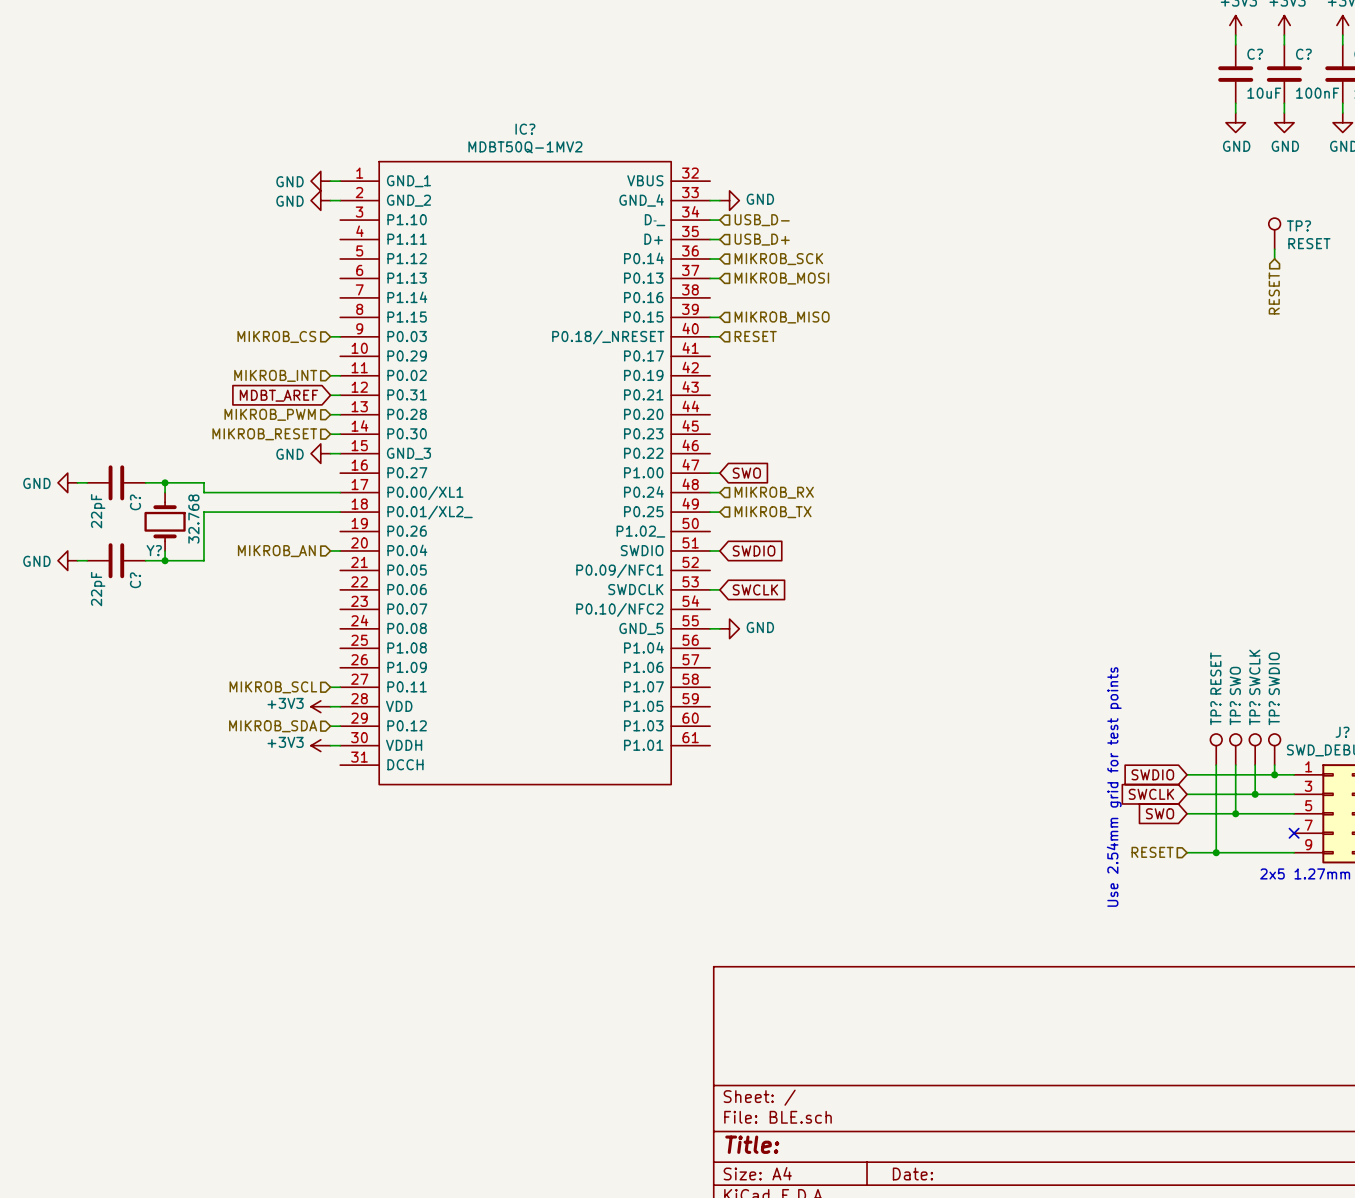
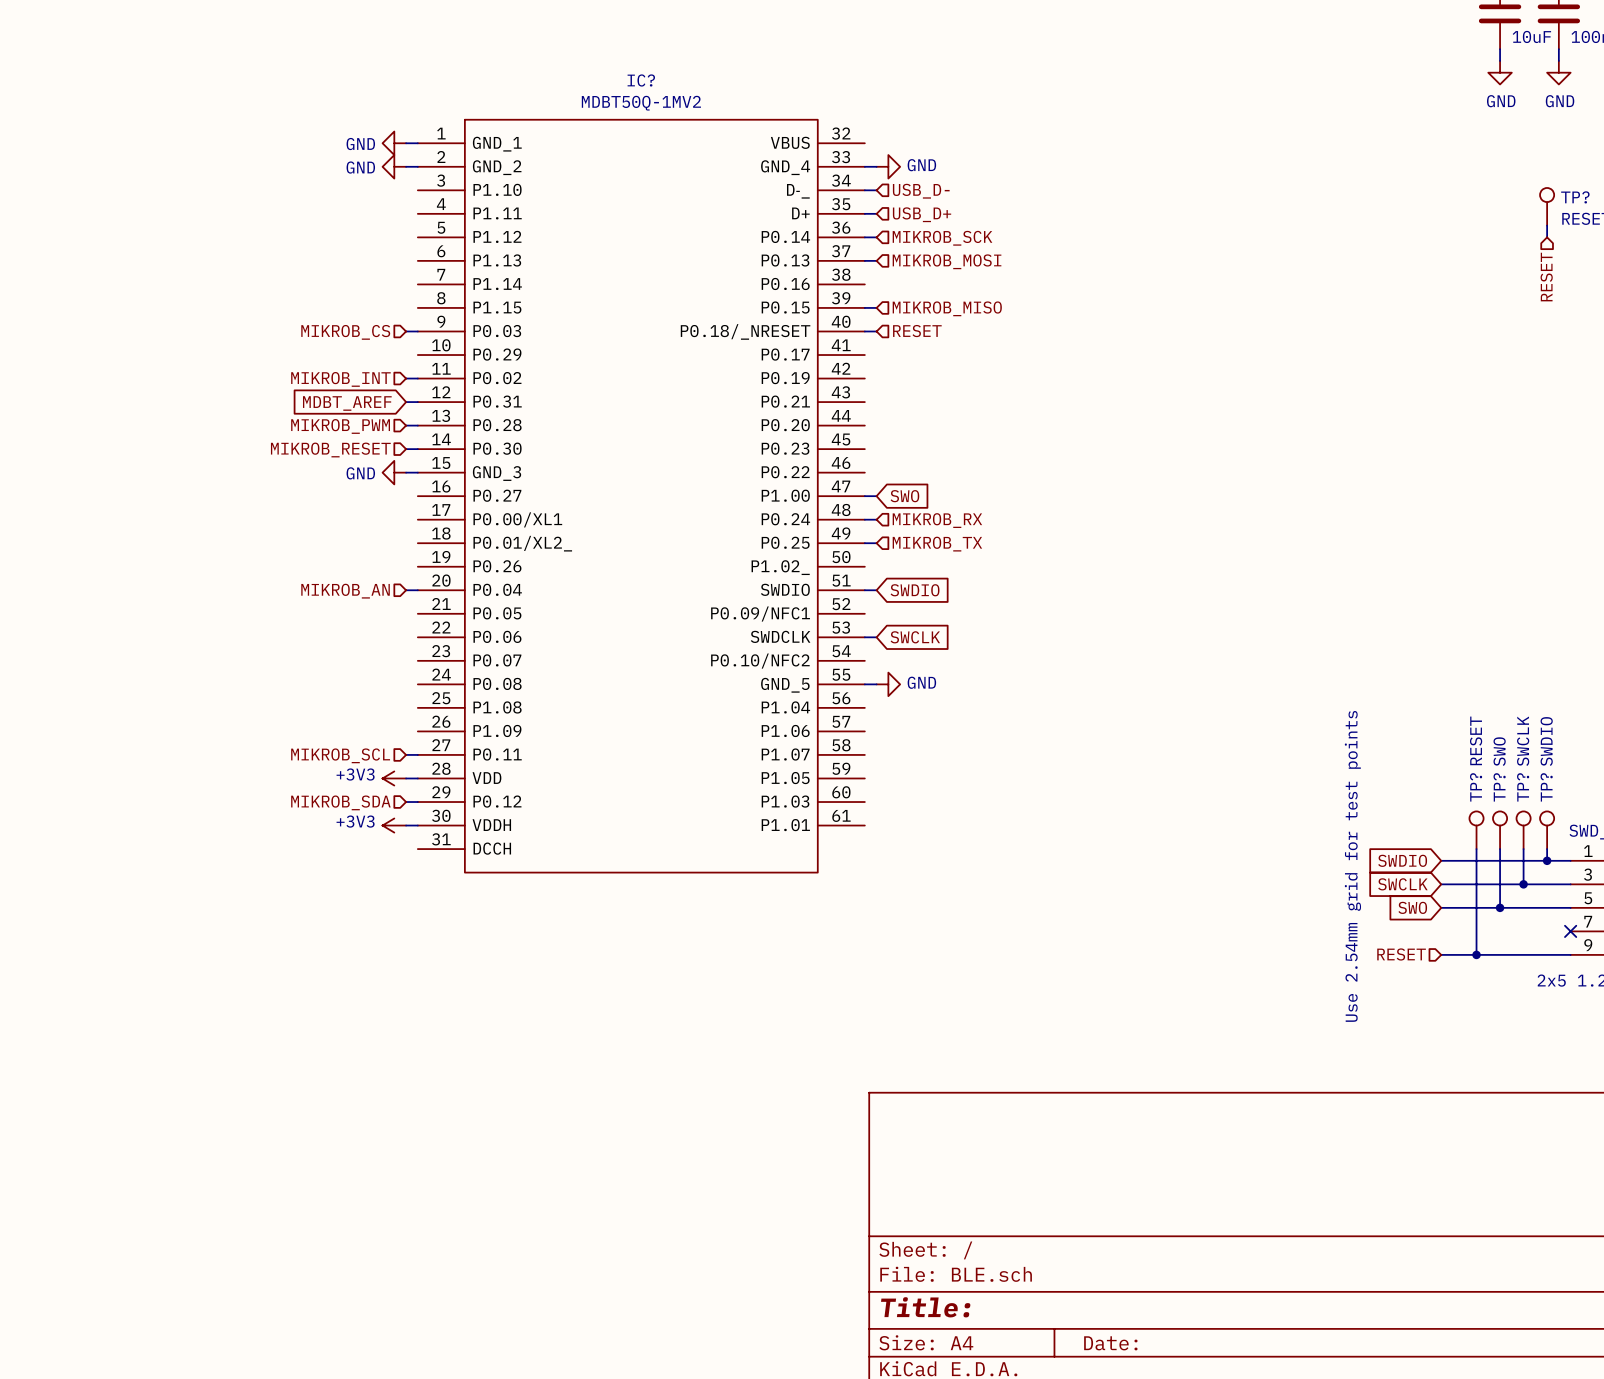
power symbol: GND (67, 482) -> none
wire: (77, 482) (87, 482) -> none
C?: 22pF (116, 482) -> none
wire: (145, 482) (203, 482) (203, 492) (340, 492) -> none
wire: (165, 482) (165, 492) -> none
junction: (165, 482) -> none
wire: (340, 512) (203, 512) (203, 560) (145, 560) -> none
Y?: 32.768 (165, 521) -> none
wire: (165, 550) (165, 560) -> none
power symbol: GND (67, 560) -> none
wire: (77, 560) (87, 560) -> none
C?: 22pF (116, 560) -> none
junction: (165, 560) -> none

